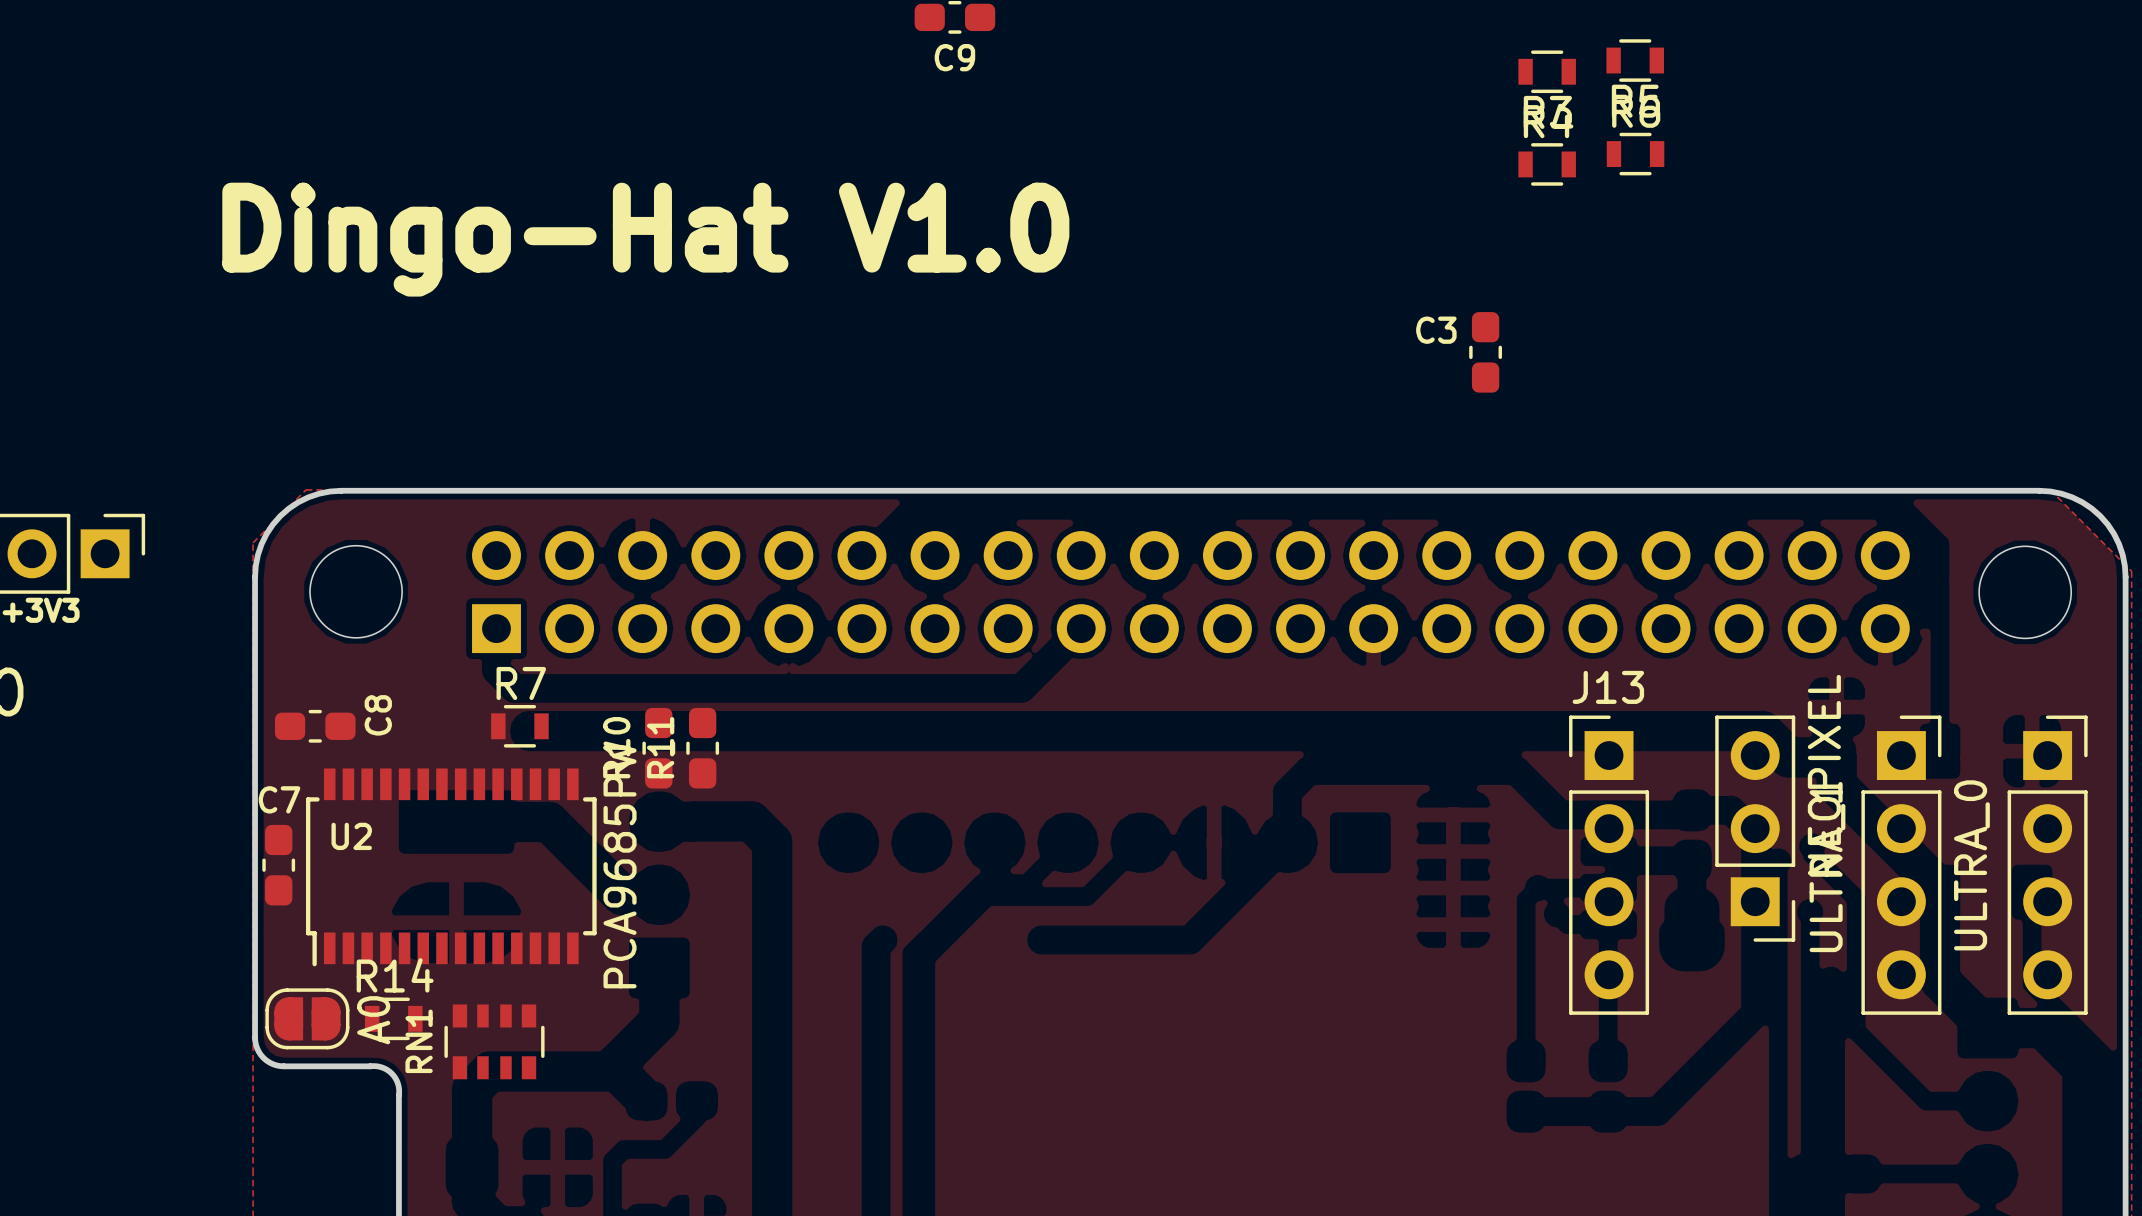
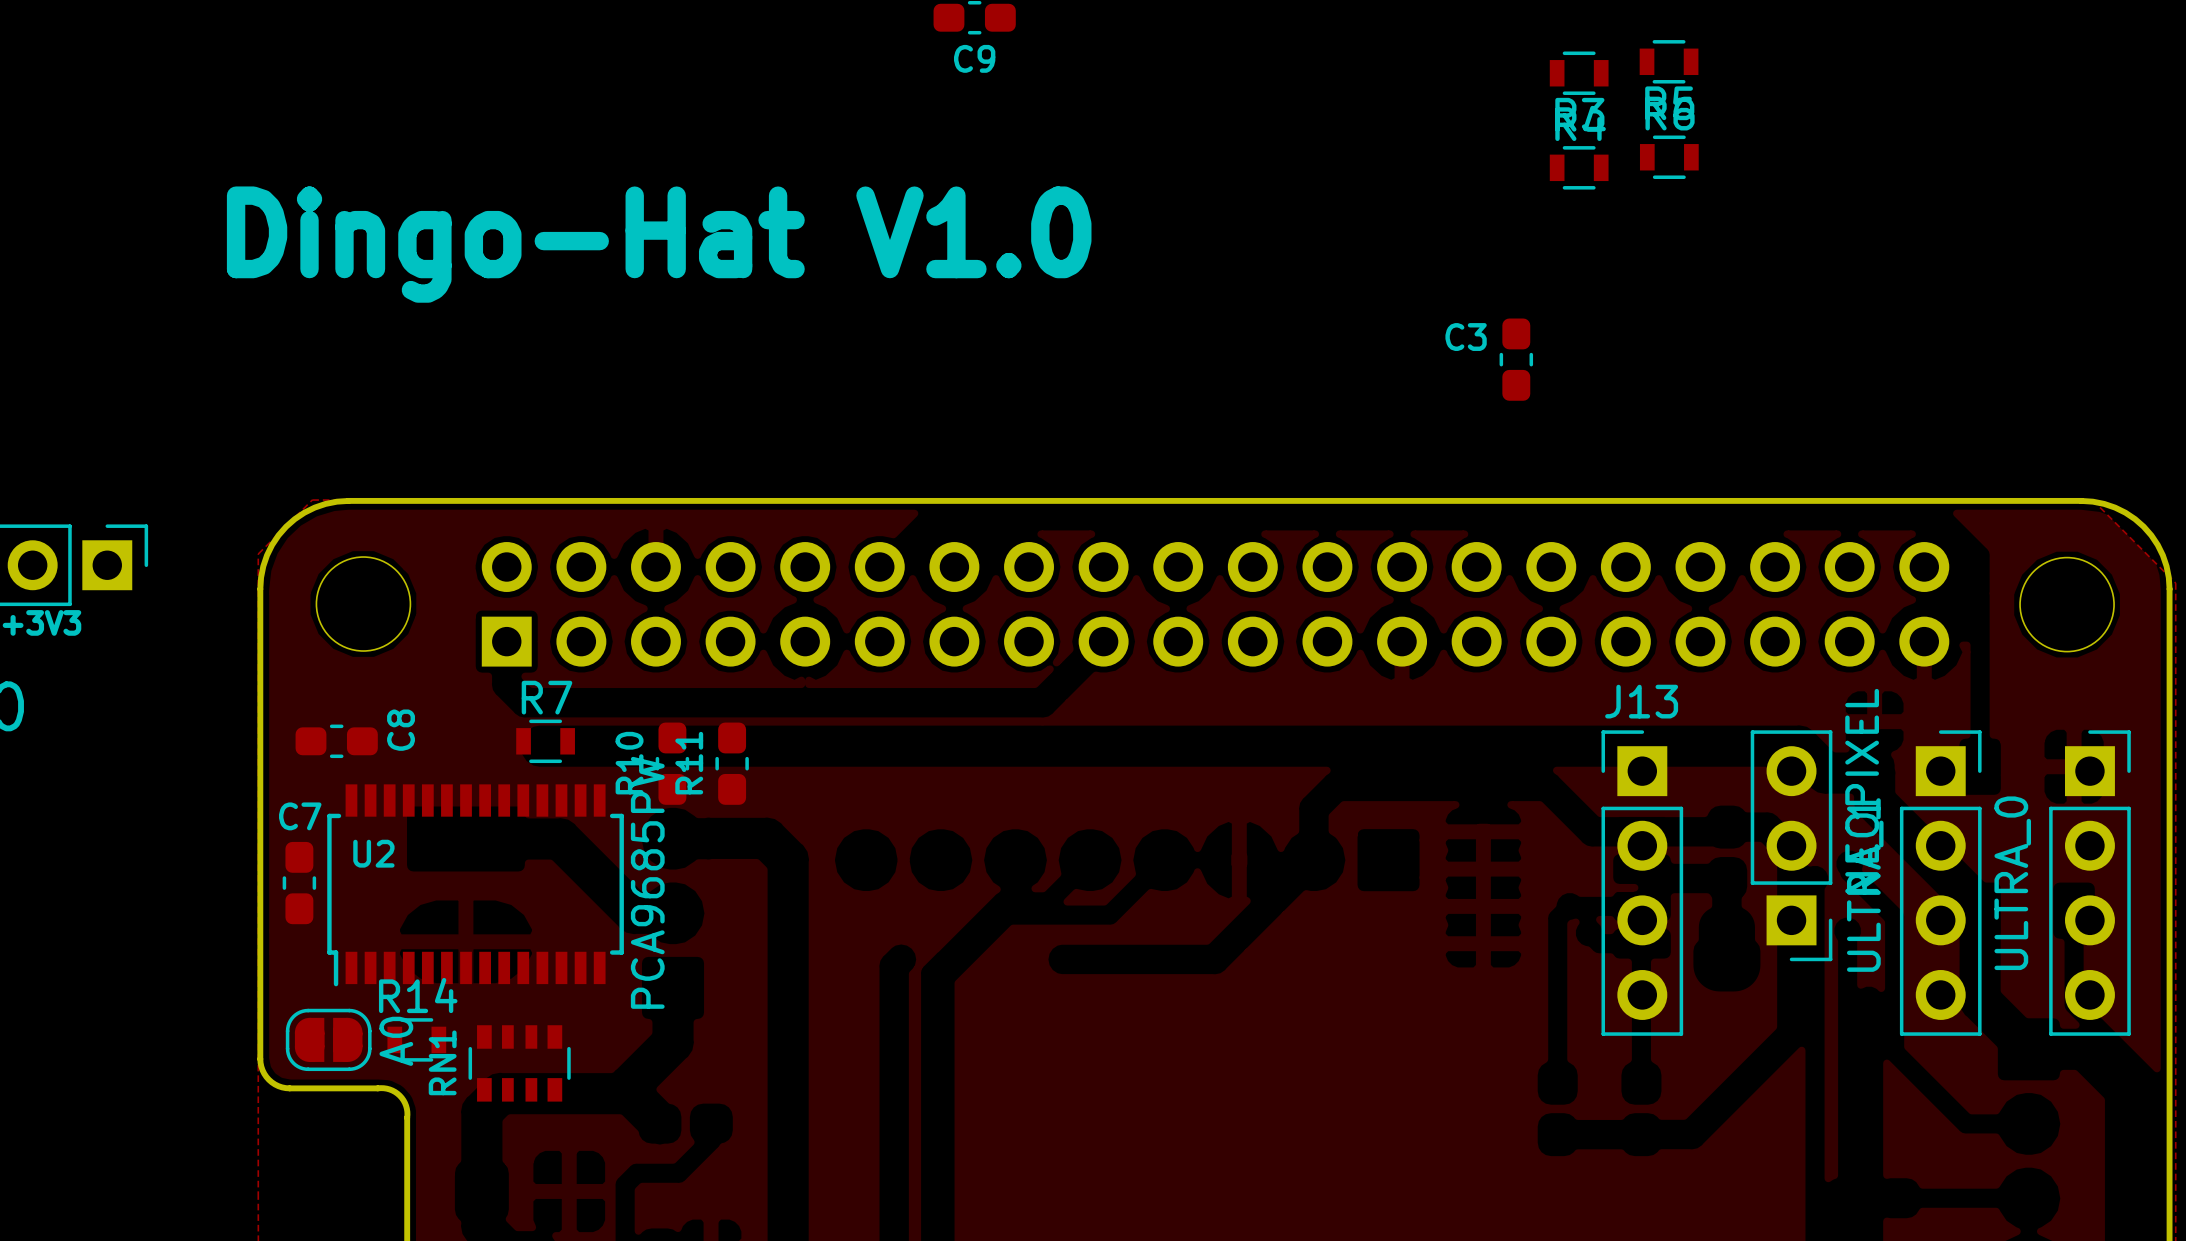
C8 position: (315, 726) -> (336, 741)
R7 position: (519, 726) -> (545, 741)
R11 position: (702, 748) -> (732, 763)
C7 position: (278, 865) -> (299, 883)
U2 position: (451, 867) -> (475, 885)
part position: (307, 1018) -> (328, 1039)
R14 position: (393, 1018) -> (416, 1039)
RN1 position: (494, 1041) -> (519, 1063)

